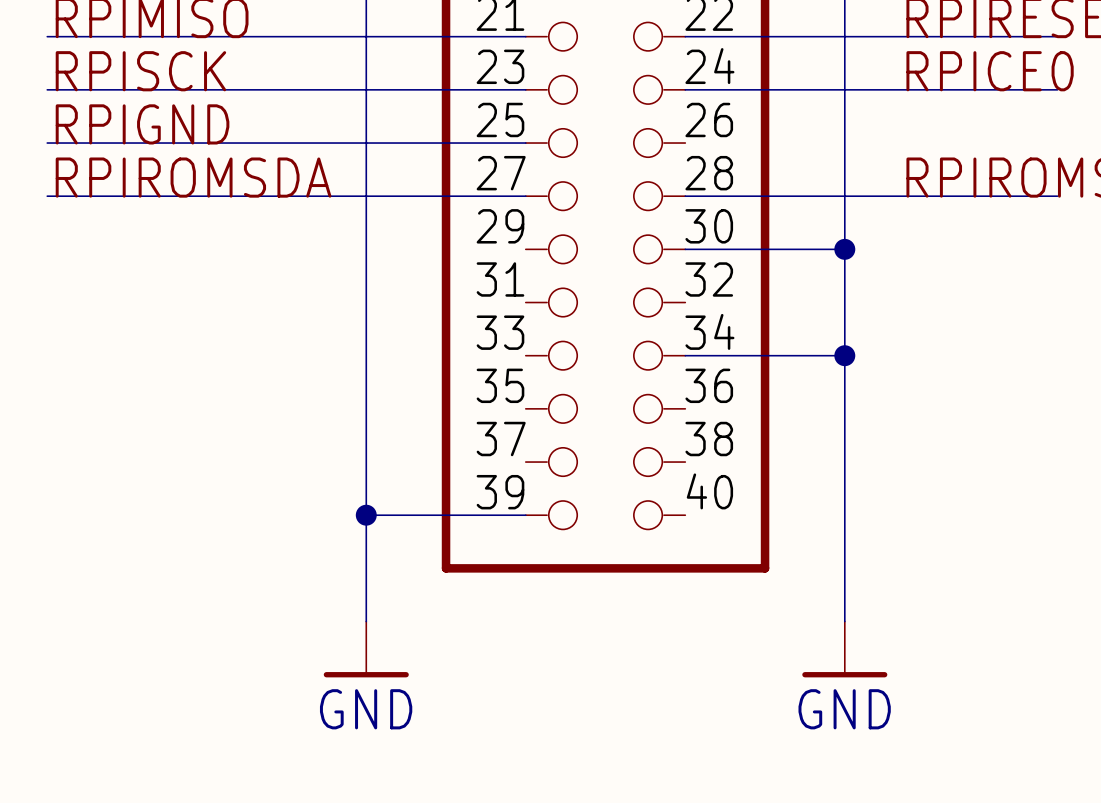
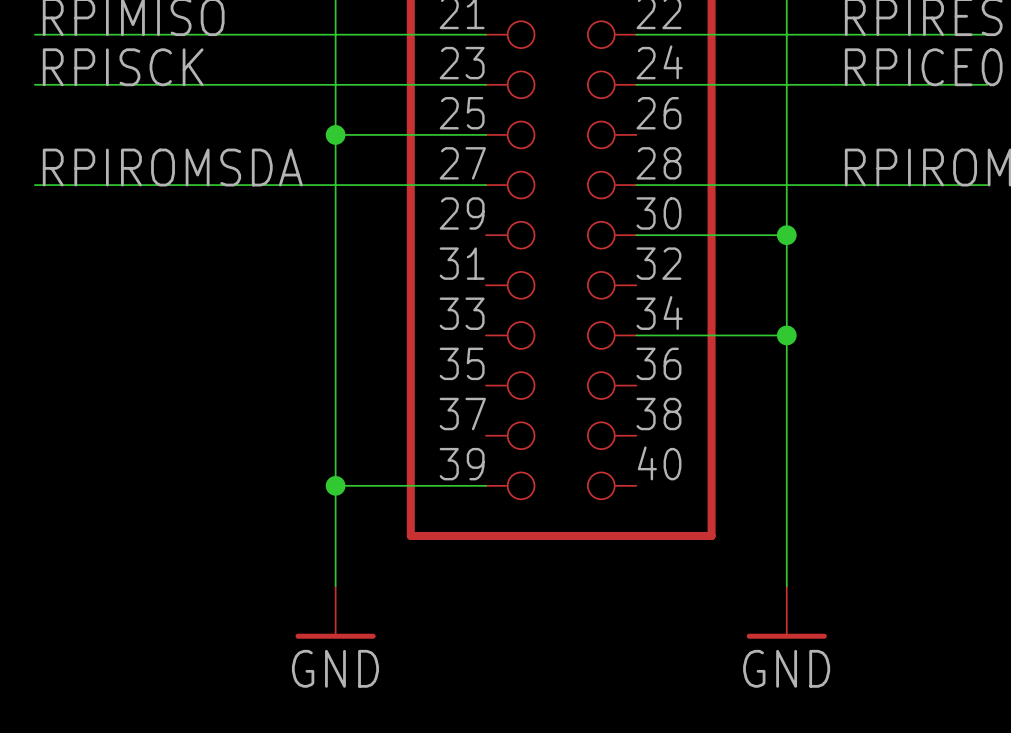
label: RPIGND (142, 124) -> none
wire: (47, 143) (366, 143) -> none
junction: none -> (335, 134)

